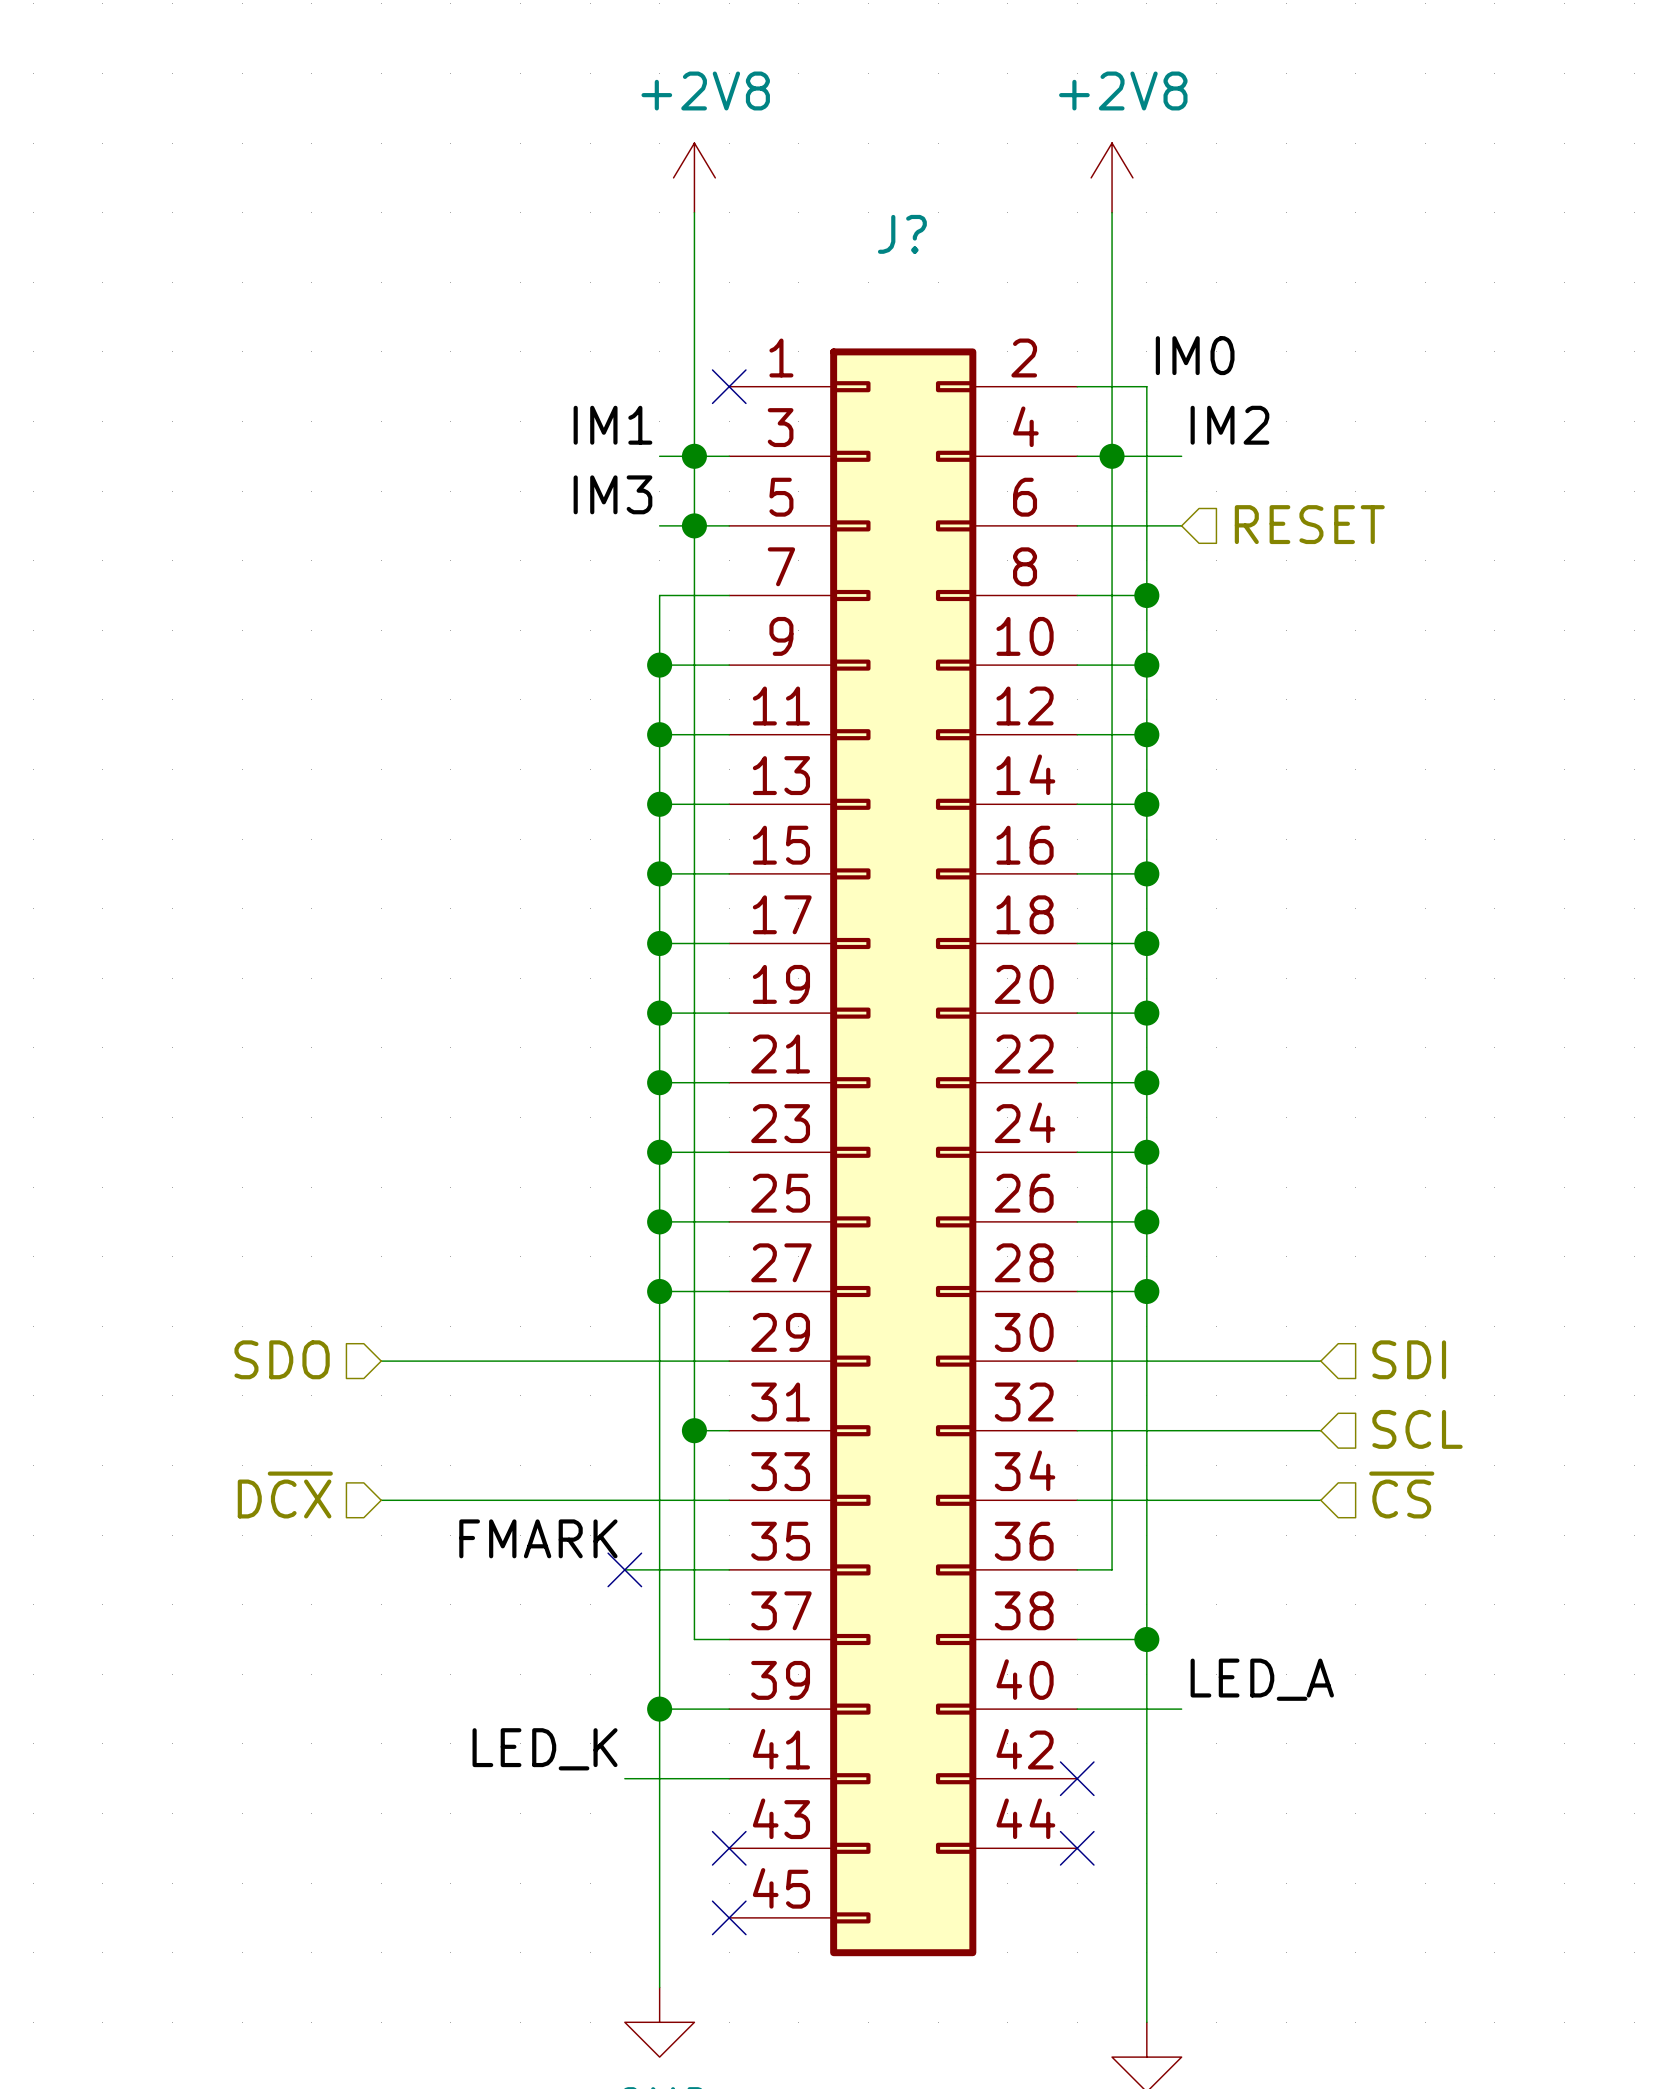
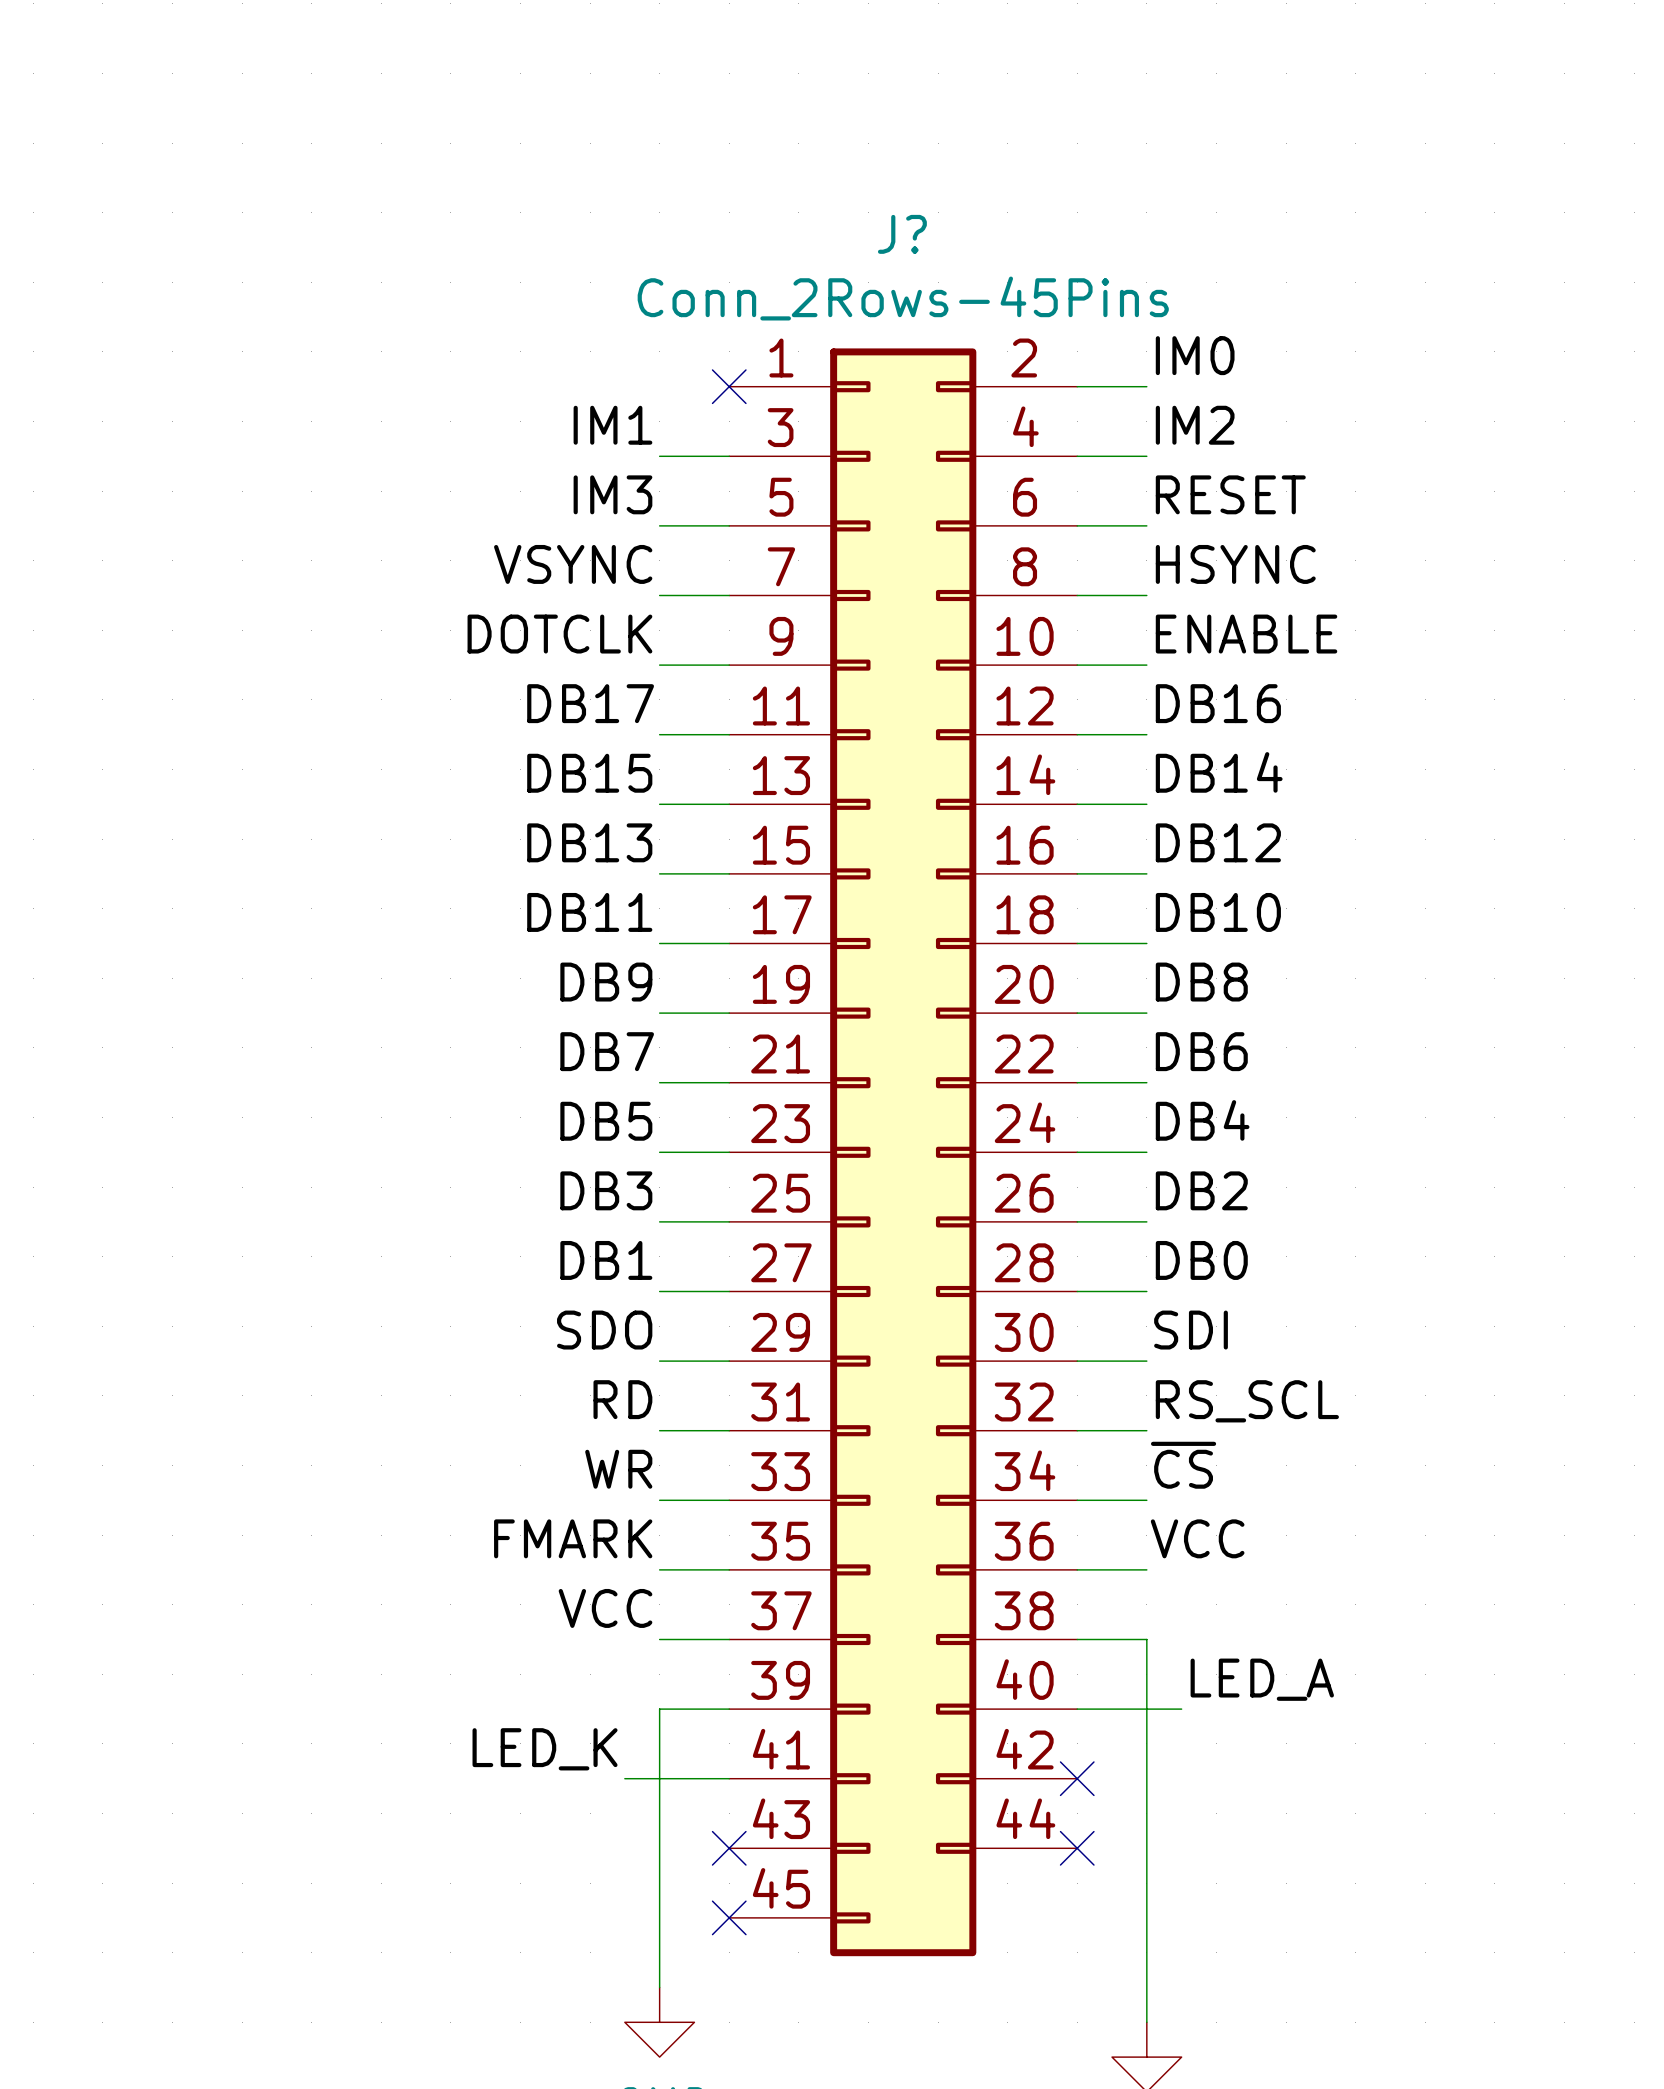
power symbol: +2V8 (694, 177) -> none
power symbol: +2V8 (1112, 177) -> none
wire: (694, 212) (694, 1639) -> (659, 1639) (694, 1639)
wire: (1112, 212) (1112, 1569) -> (1146, 1569) (1112, 1569)
J? value: none -> Conn_2Rows-45Pins (903, 298)
wire: (1146, 386) (1146, 1639) -> none
label position: IM2 (1229, 425) -> IM2 (1195, 425)
junction: (694, 456) -> none
junction: (1112, 456) -> none
wire: (1146, 456) (1181, 456) -> none
label: none -> RESET (1230, 494)
hierarchical label: RESET (1309, 524) -> none
junction: (694, 525) -> none
wire: (1146, 525) (1181, 525) -> none
label: none -> VSYNC (573, 564)
label: none -> HSYNC (1235, 564)
wire: (659, 595) (659, 1709) -> none
junction: (1146, 595) -> none
label: none -> DOTCLK (559, 634)
label: none -> ENABLE (1246, 634)
junction: (659, 665) -> none
junction: (1146, 665) -> none
label: none -> DB17 (590, 703)
label: none -> DB16 (1218, 703)
junction: (659, 734) -> none
junction: (1146, 734) -> none
label: none -> DB14 (1219, 772)
label: none -> DB15 (589, 773)
junction: (659, 804) -> none
junction: (1146, 804) -> none
label: none -> DB13 (589, 842)
label: none -> DB12 (1218, 842)
junction: (659, 873) -> none
junction: (1146, 873) -> none
label: none -> DB11 (589, 912)
label: none -> DB10 (1218, 912)
junction: (659, 943) -> none
junction: (1146, 943) -> none
label: none -> DB9 (606, 982)
label: none -> DB8 (1201, 982)
junction: (659, 1013) -> none
junction: (1146, 1013) -> none
label: none -> DB7 (607, 1051)
label: none -> DB6 (1201, 1051)
junction: (659, 1082) -> none
junction: (1146, 1082) -> none
label: none -> DB4 (1202, 1120)
label: none -> DB5 (606, 1121)
junction: (659, 1152) -> none
junction: (1146, 1152) -> none
label: none -> DB3 (606, 1190)
label: none -> DB2 (1201, 1190)
junction: (659, 1221) -> none
junction: (1146, 1221) -> none
label: none -> DB1 (606, 1260)
label: none -> DB0 (1201, 1260)
junction: (659, 1291) -> none
junction: (1146, 1291) -> none
label: none -> SDO (604, 1330)
label: none -> SDI (1191, 1330)
hierarchical label: SDO (282, 1359) -> none
hierarchical label: SDI (1409, 1359) -> none
wire: (381, 1361) (659, 1361) -> none
wire: (1146, 1361) (1320, 1361) -> none
label: none -> RD (622, 1399)
label: none -> RS_SCL (1247, 1401)
hierarchical label: SCL (1417, 1429) -> none
junction: (694, 1430) -> none
wire: (1146, 1430) (1320, 1430) -> none
label: none -> ~{CS} (1183, 1465)
label: none -> WR (618, 1469)
hierarchical label: D~{CX} (285, 1495) -> none
hierarchical label: ~{CS} (1401, 1495) -> none
wire: (381, 1500) (659, 1500) -> none
wire: (1146, 1500) (1320, 1500) -> none
label position: FMARK (538, 1538) -> FMARK (573, 1538)
label: none -> VCC (1197, 1538)
wire: (624, 1569) (659, 1569) -> (659, 1430) (694, 1430)
no-connect mark: (624, 1569) -> none
label: none -> VCC (605, 1608)
junction: (1146, 1639) -> none
junction: (659, 1709) -> none

